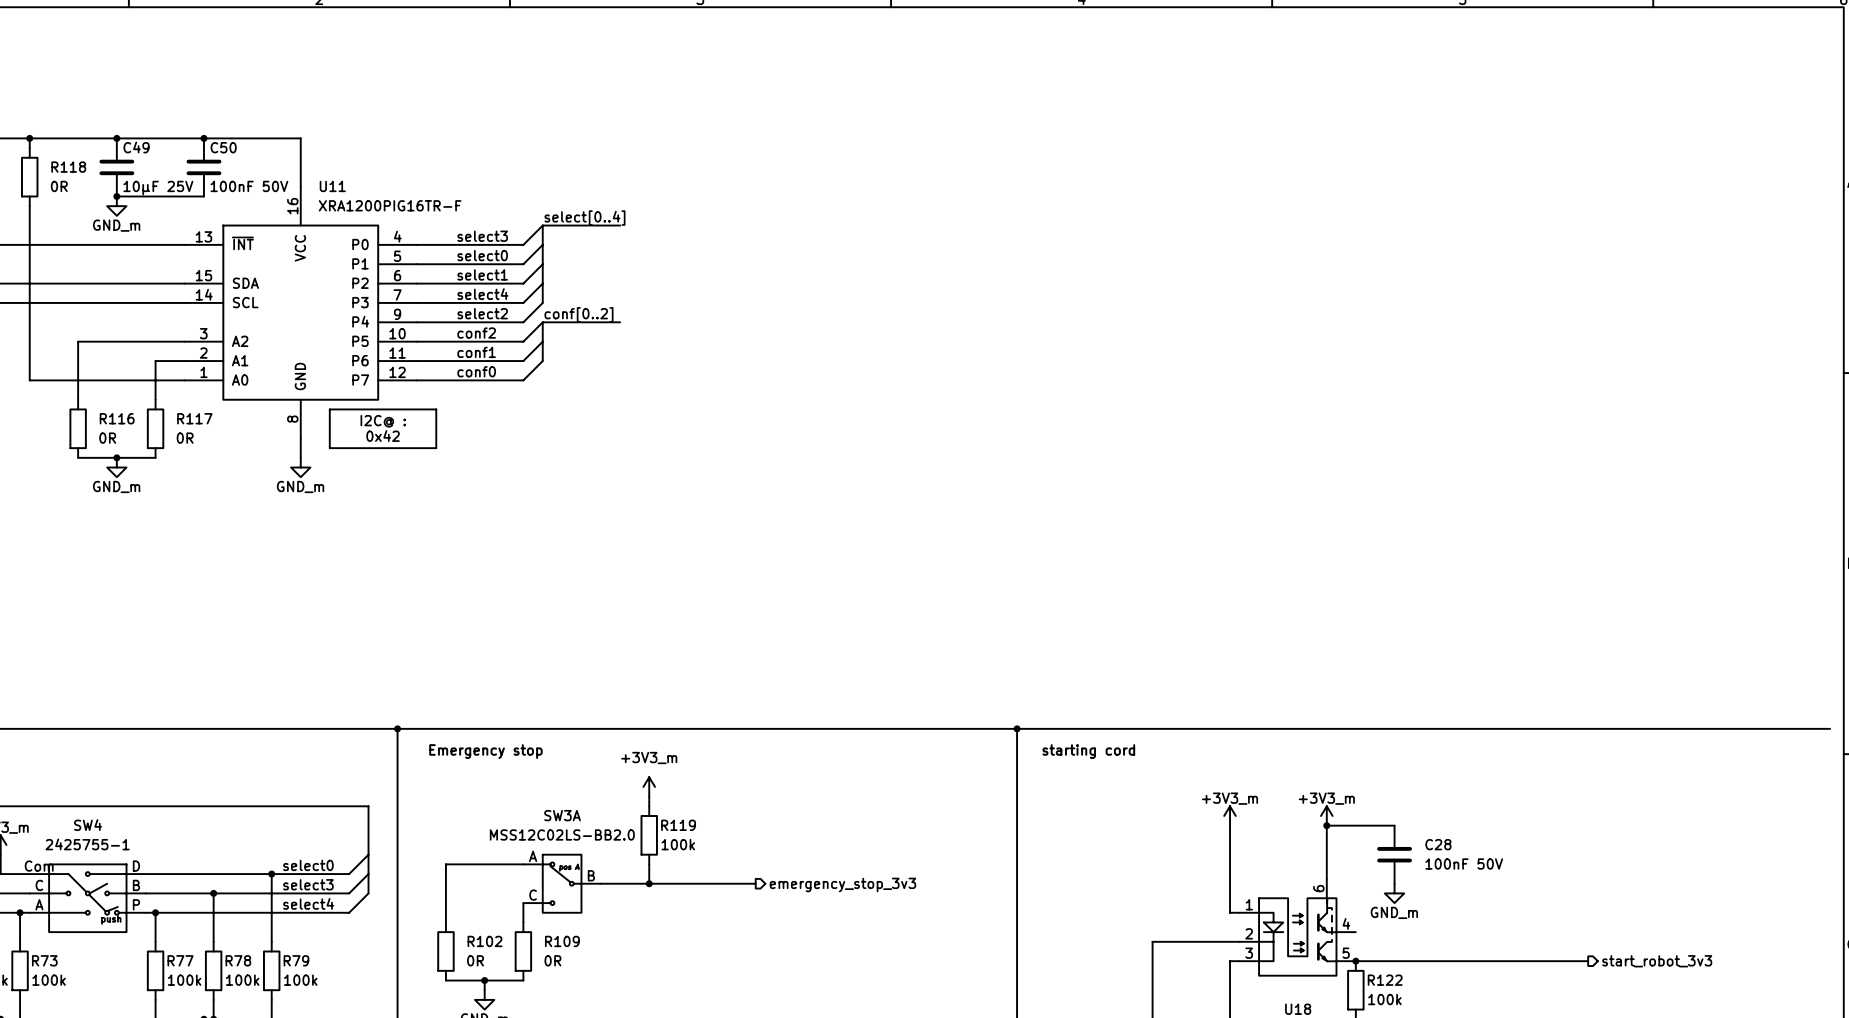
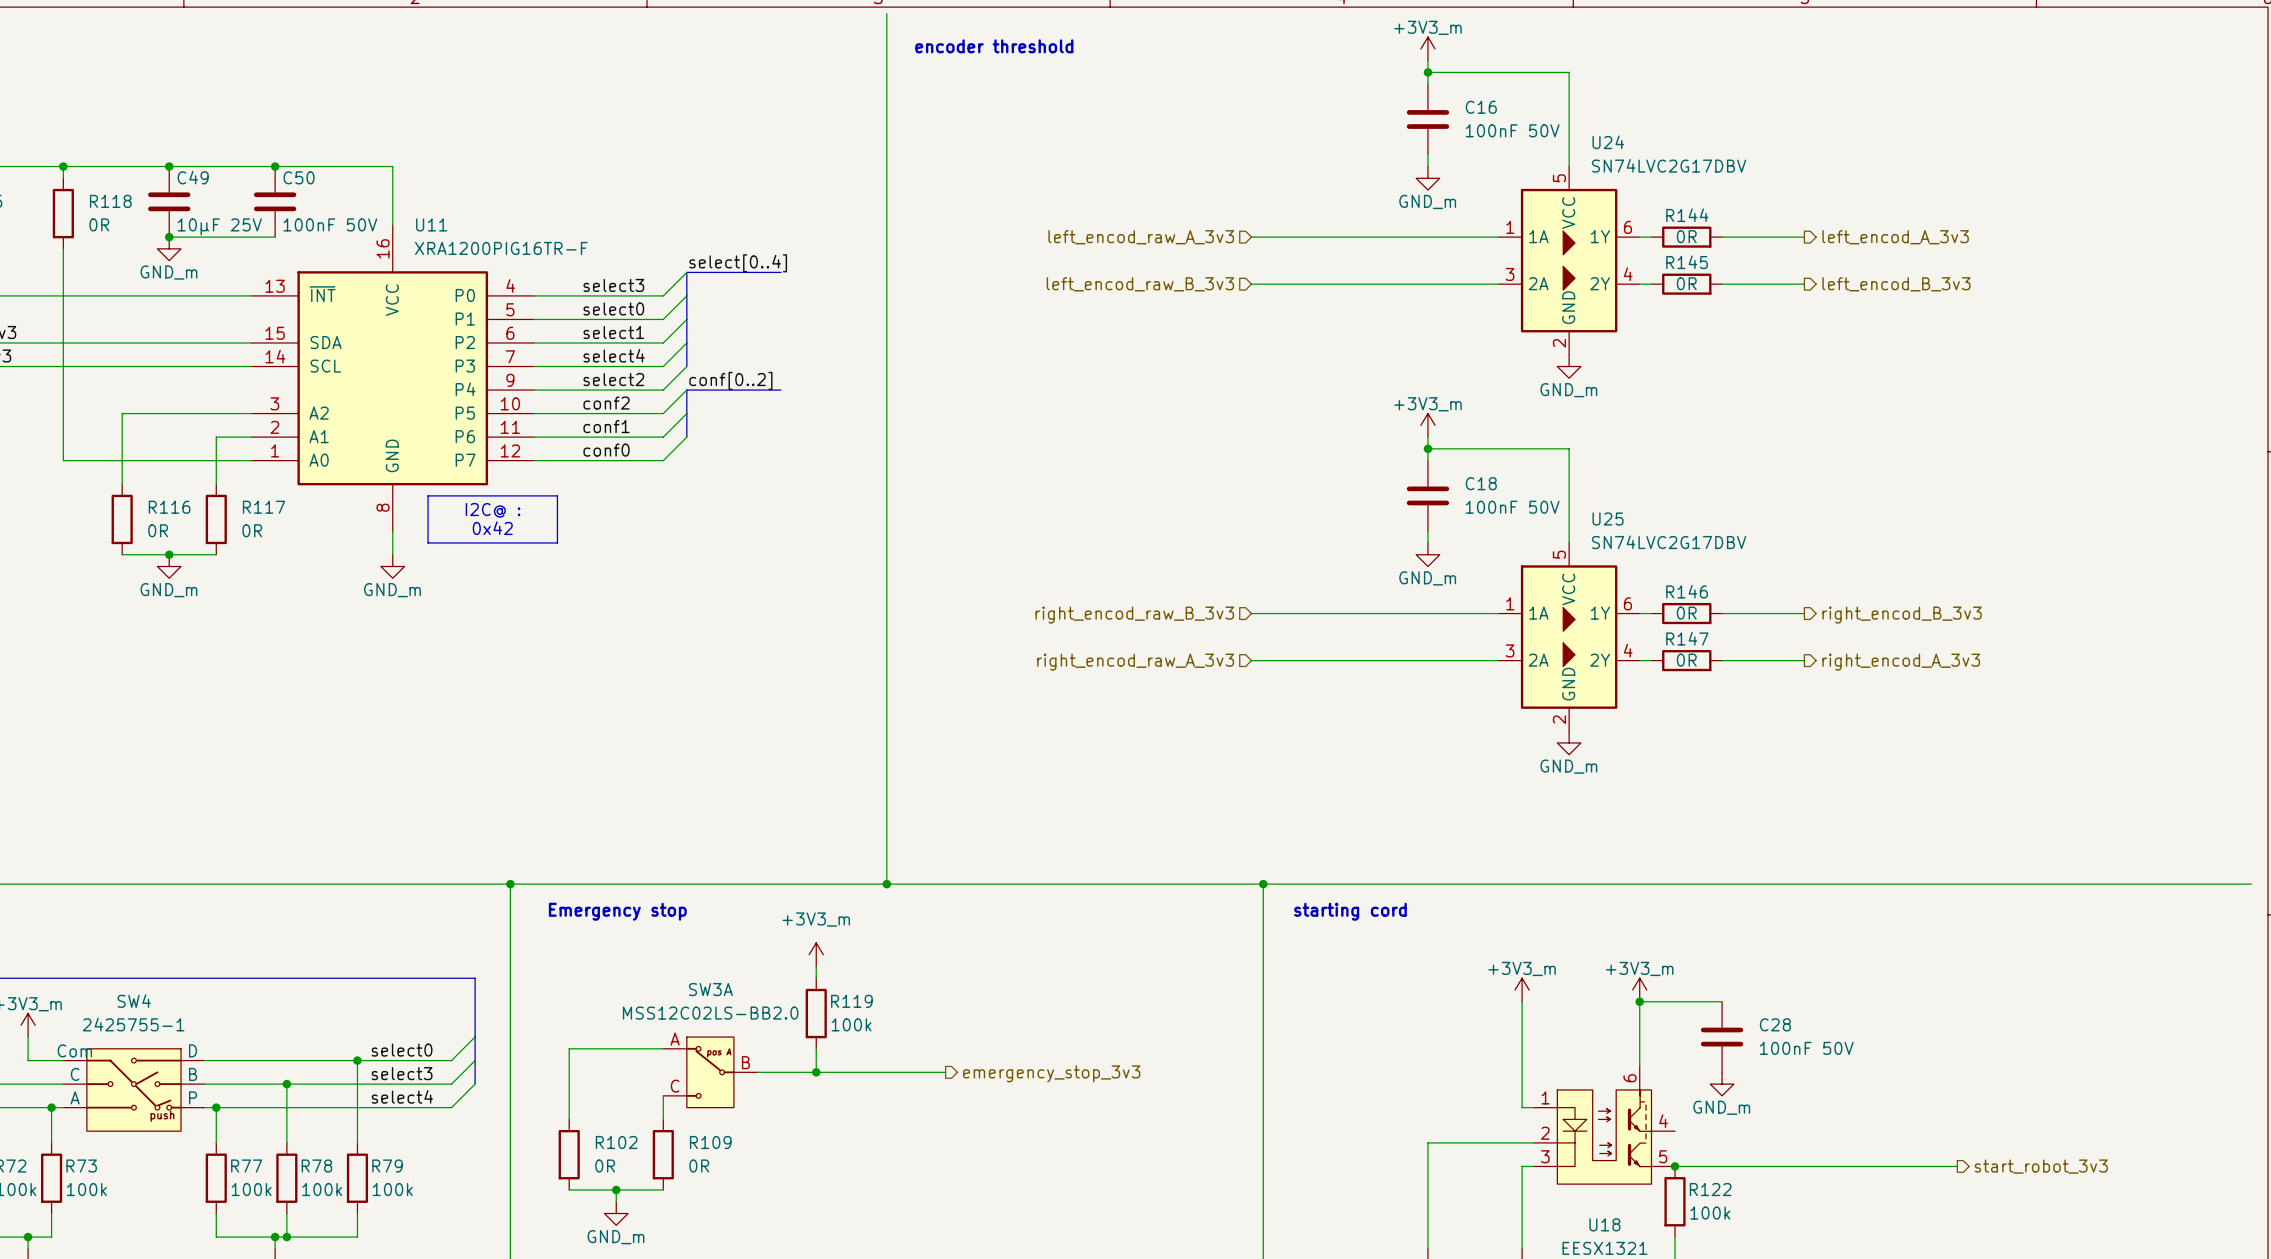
wire: none -> (886, 13) (886, 884)
text: none -> encoder threshold (994, 46)
power symbol: none -> +3V3_m (1427, 48)
wire: none -> (1427, 60) (1427, 84)
wire: none -> (1427, 72) (1569, 72) (1569, 166)
junction: none -> (1427, 72)
C16: none -> 100nF 50V (1427, 119)
wire: none -> (1427, 154) (1427, 166)
power symbol: none -> GND_m (1427, 178)
hierarchical label: none -> left_encod_raw_A_3v3 (1141, 237)
wire: none -> (1251, 237) (1498, 237)
wire: none -> (1639, 237) (1651, 237)
R144: none -> 0R (1686, 237)
wire: none -> (1722, 237) (1804, 237)
hierarchical label: none -> left_encod_A_3v3 (1895, 237)
U24: none -> SN74LVC2G17DBV (1569, 260)
hierarchical label: none -> left_encod_raw_B_3v3 (1140, 284)
wire: none -> (1251, 284) (1498, 284)
wire: none -> (1639, 284) (1651, 284)
R145: none -> 0R (1686, 284)
wire: none -> (1722, 284) (1804, 284)
hierarchical label: none -> left_encod_B_3v3 (1896, 284)
power symbol: none -> GND_m (1569, 366)
power symbol: none -> +3V3_m (1427, 425)
wire: none -> (1427, 437) (1427, 460)
wire: none -> (1427, 448) (1569, 448) (1569, 542)
junction: none -> (1427, 448)
C18: none -> 100nF 50V (1427, 495)
wire: none -> (1427, 531) (1427, 542)
power symbol: none -> GND_m (1427, 554)
wire: none -> (1251, 613) (1498, 613)
wire: none -> (1639, 613) (1651, 613)
R146: none -> 0R (1686, 613)
wire: none -> (1722, 613) (1804, 613)
hierarchical label: none -> right_encod_raw_B_3v3 (1134, 615)
hierarchical label: none -> right_encod_B_3v3 (1902, 615)
U25: none -> SN74LVC2G17DBV (1569, 637)
wire: none -> (1251, 660) (1498, 660)
wire: none -> (1639, 660) (1651, 660)
R147: none -> 0R (1686, 660)
wire: none -> (1722, 660) (1804, 660)
hierarchical label: none -> right_encod_raw_A_3v3 (1135, 662)
hierarchical label: none -> right_encod_A_3v3 (1901, 662)
power symbol: none -> GND_m (1569, 742)
junction: none -> (886, 884)

